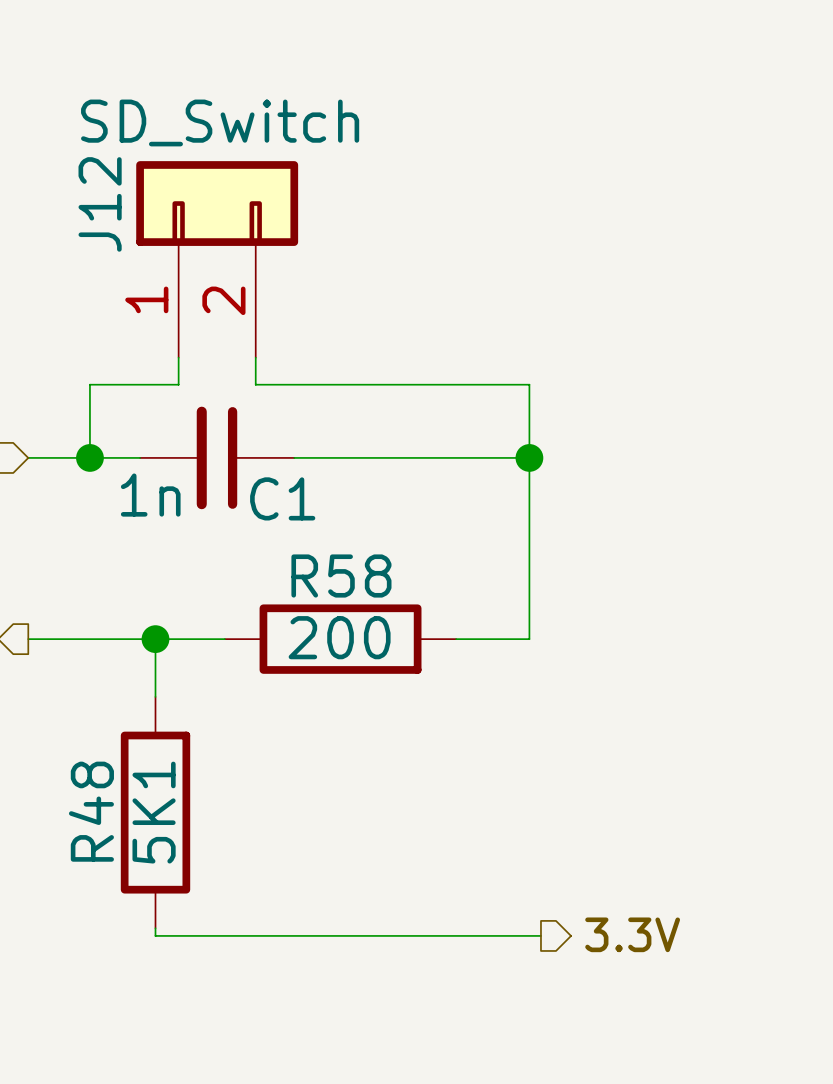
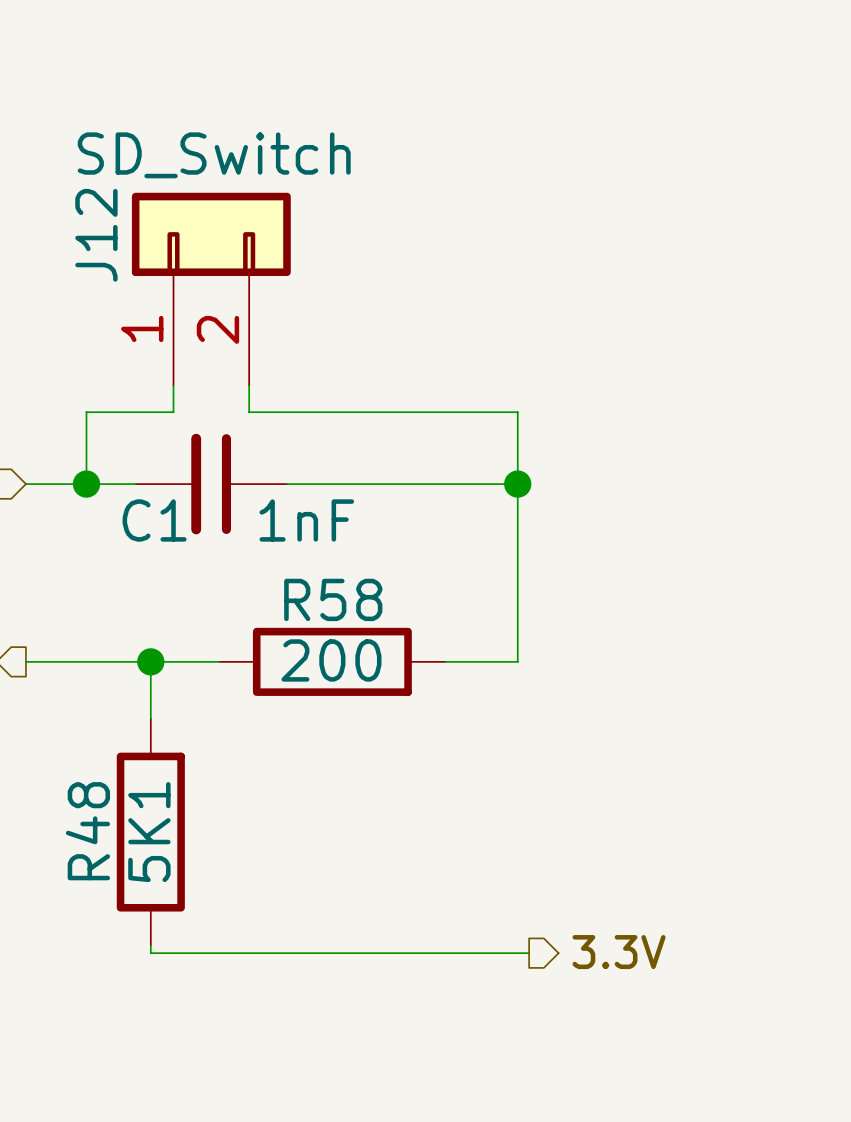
C1 value: 1n (150, 495) -> 1nF (306, 520)
C1 name position: C1 (282, 498) -> C1 (154, 520)

